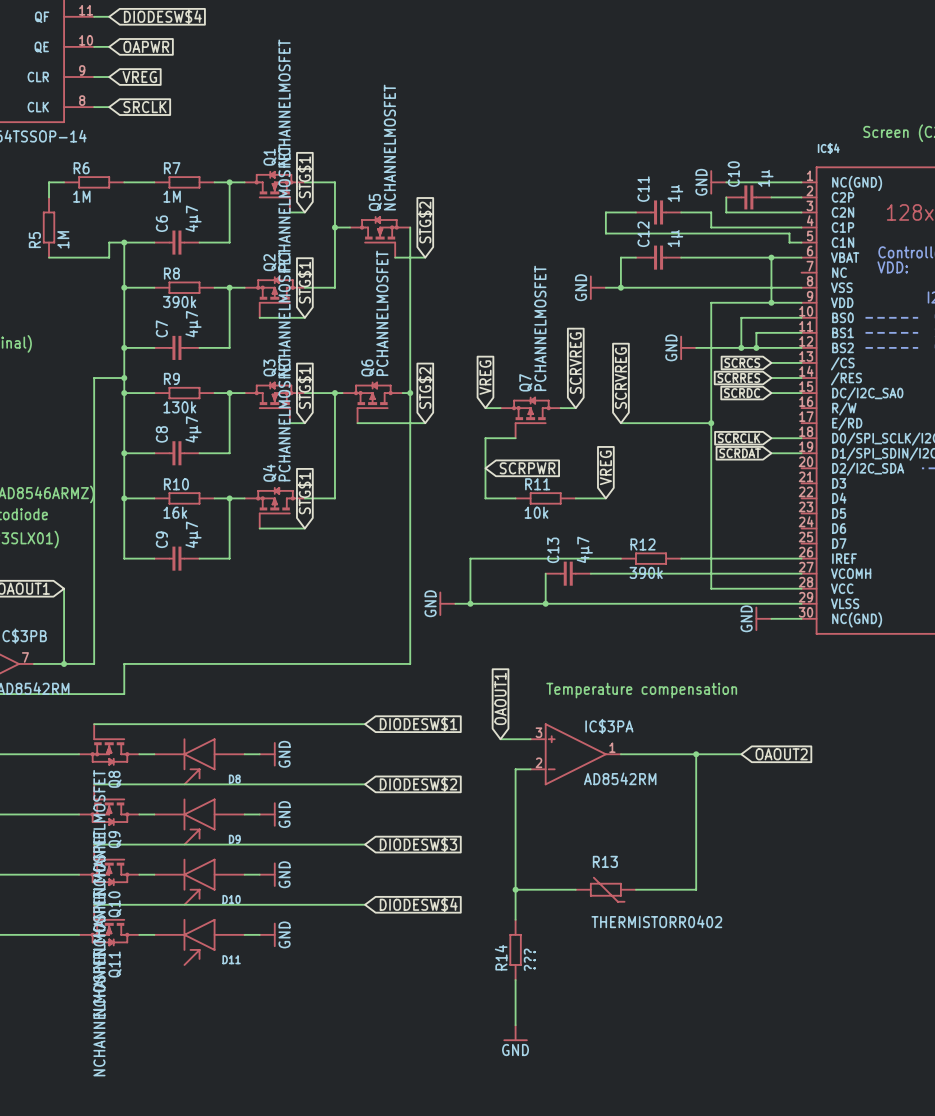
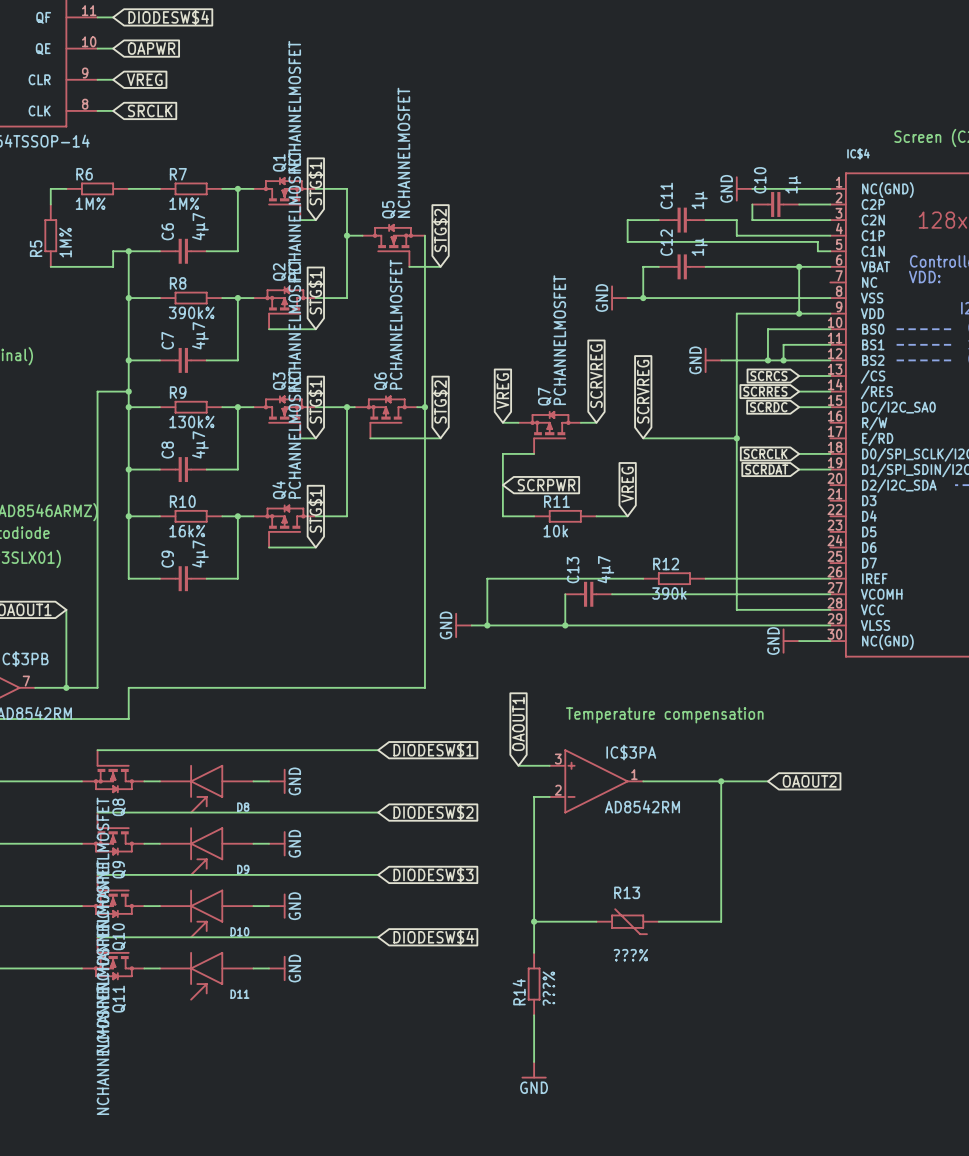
R6 value: 1M (81, 196) -> 1M% (90, 203)
R7 value: 1M (172, 196) -> 1M% (184, 203)
R5 value: 1M (63, 239) -> 1M% (65, 242)
R8 value: 390k (179, 302) -> 390k% (191, 312)
R9 value: 130k (179, 407) -> 130k% (191, 422)
R10 value: 16k (175, 512) -> 16k% (187, 531)
R13 value: THERMISTORR0402 (656, 921) -> ???% (630, 955)
R14 value: ??? (529, 959) -> ???% (548, 988)

